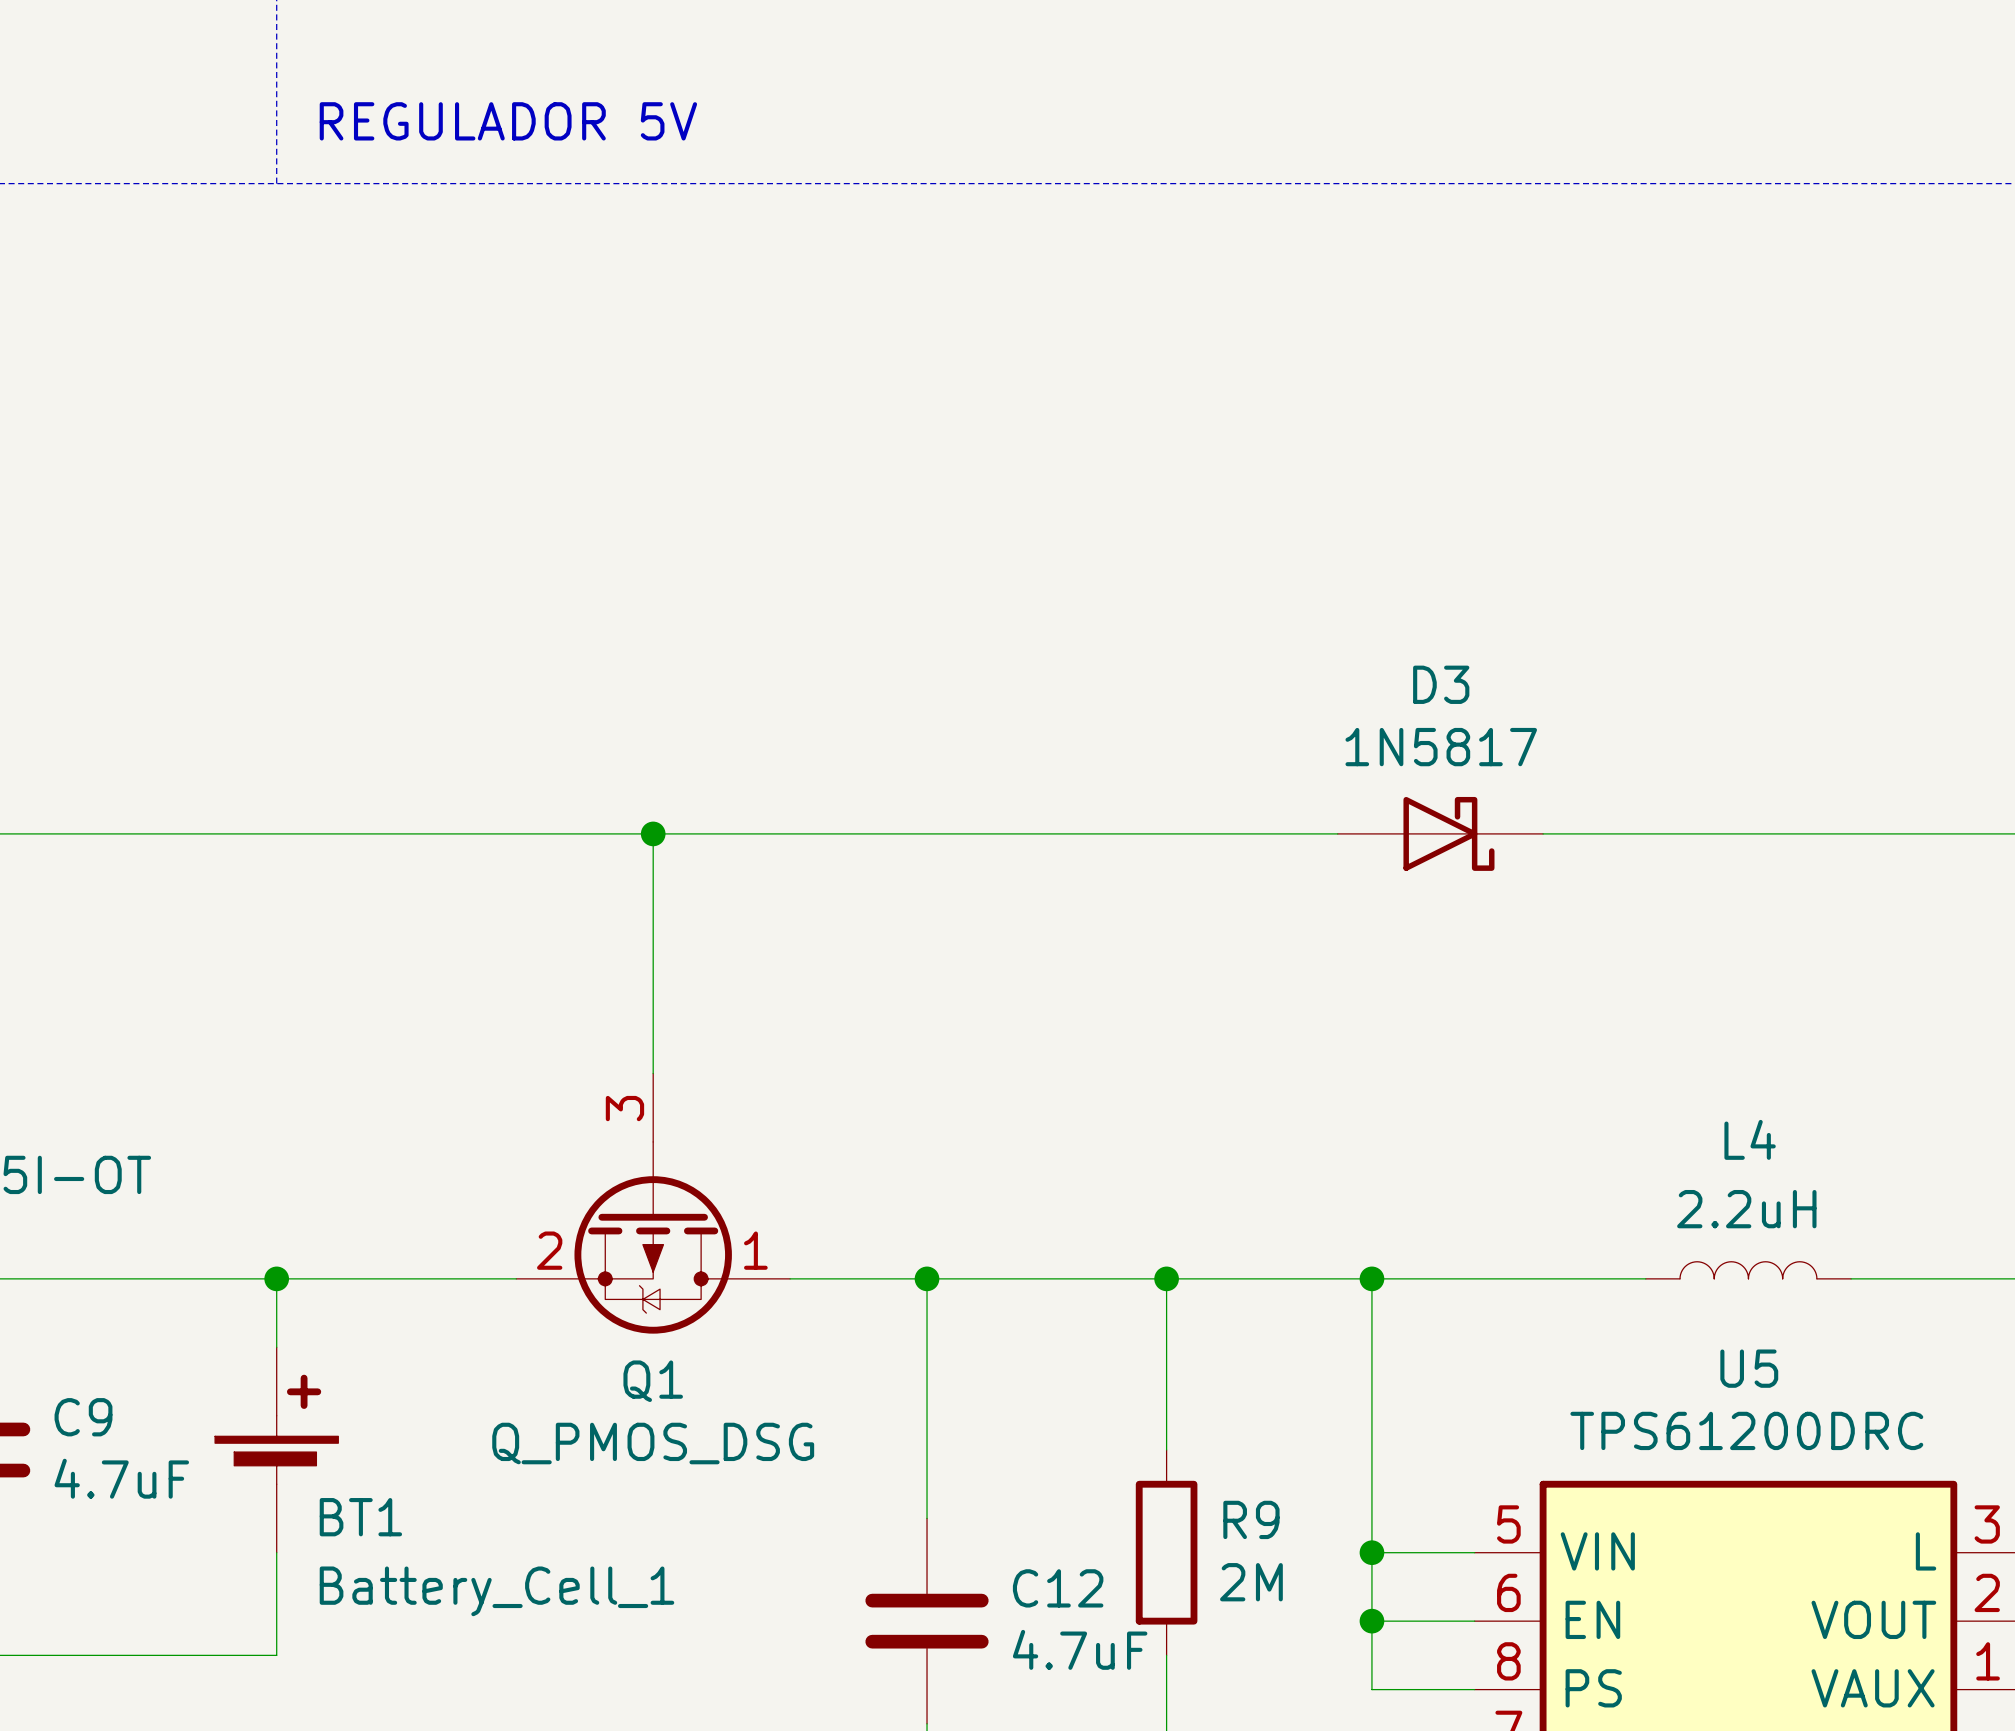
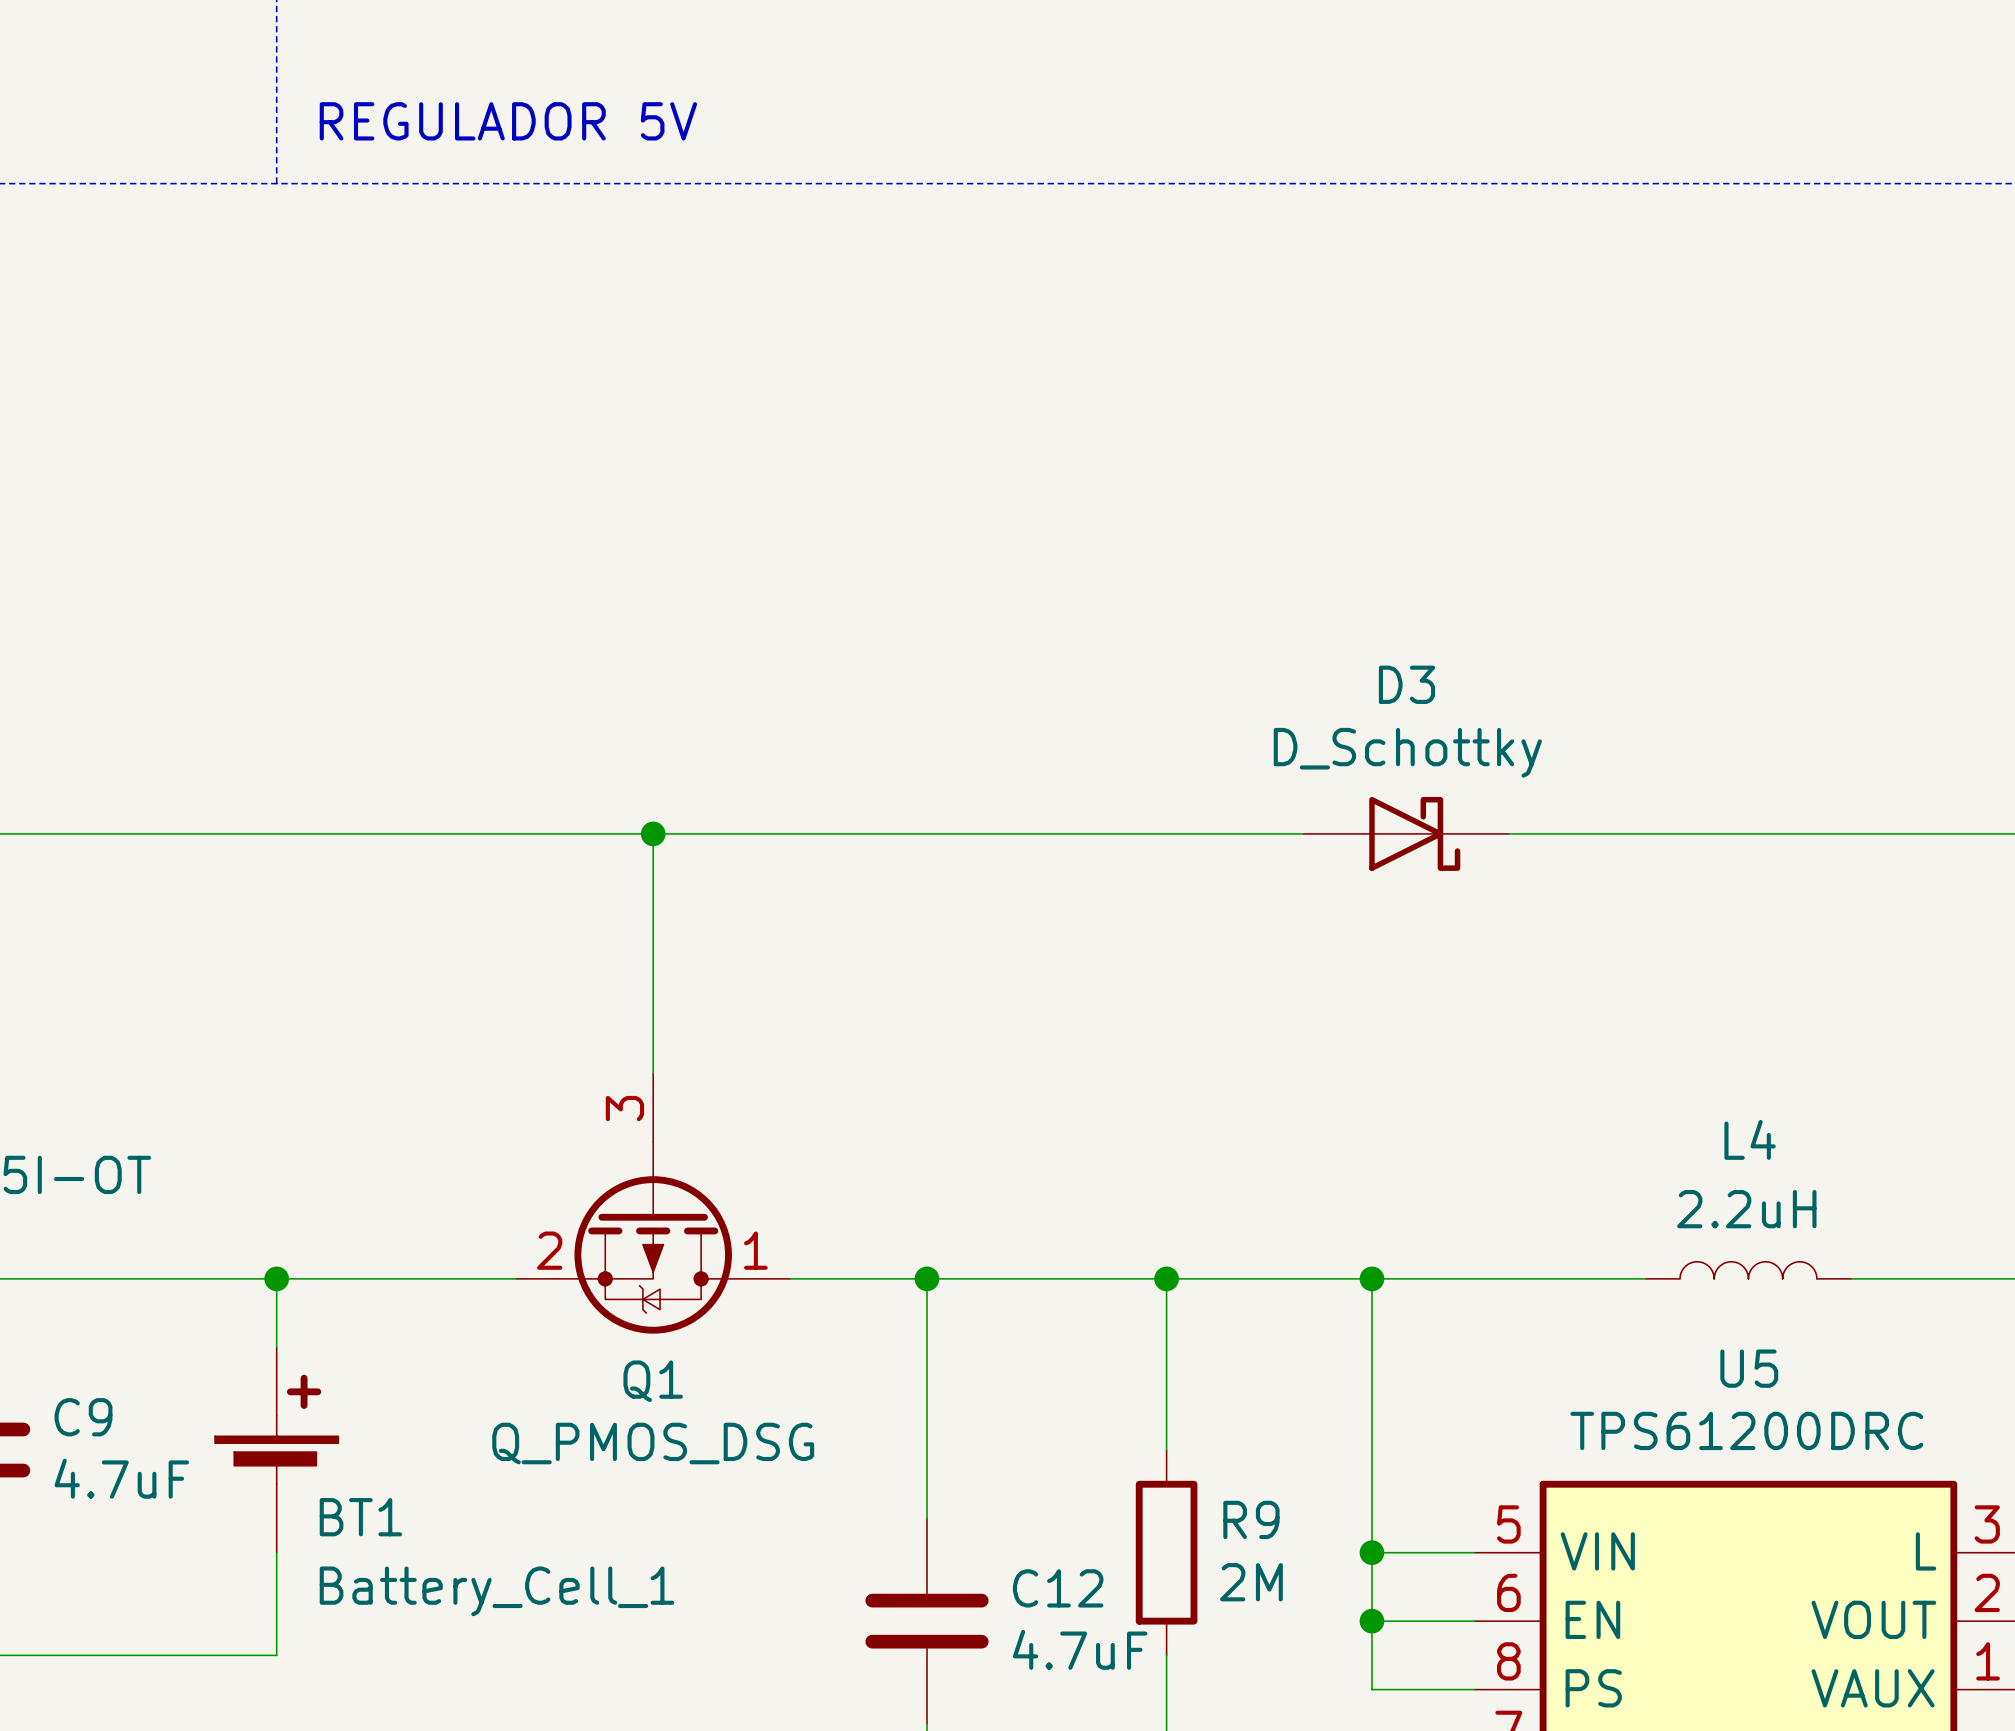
D3 value: 1N5817 (1441, 747) -> D_Schottky (1407, 752)
D3 position: (1440, 833) -> (1406, 833)

